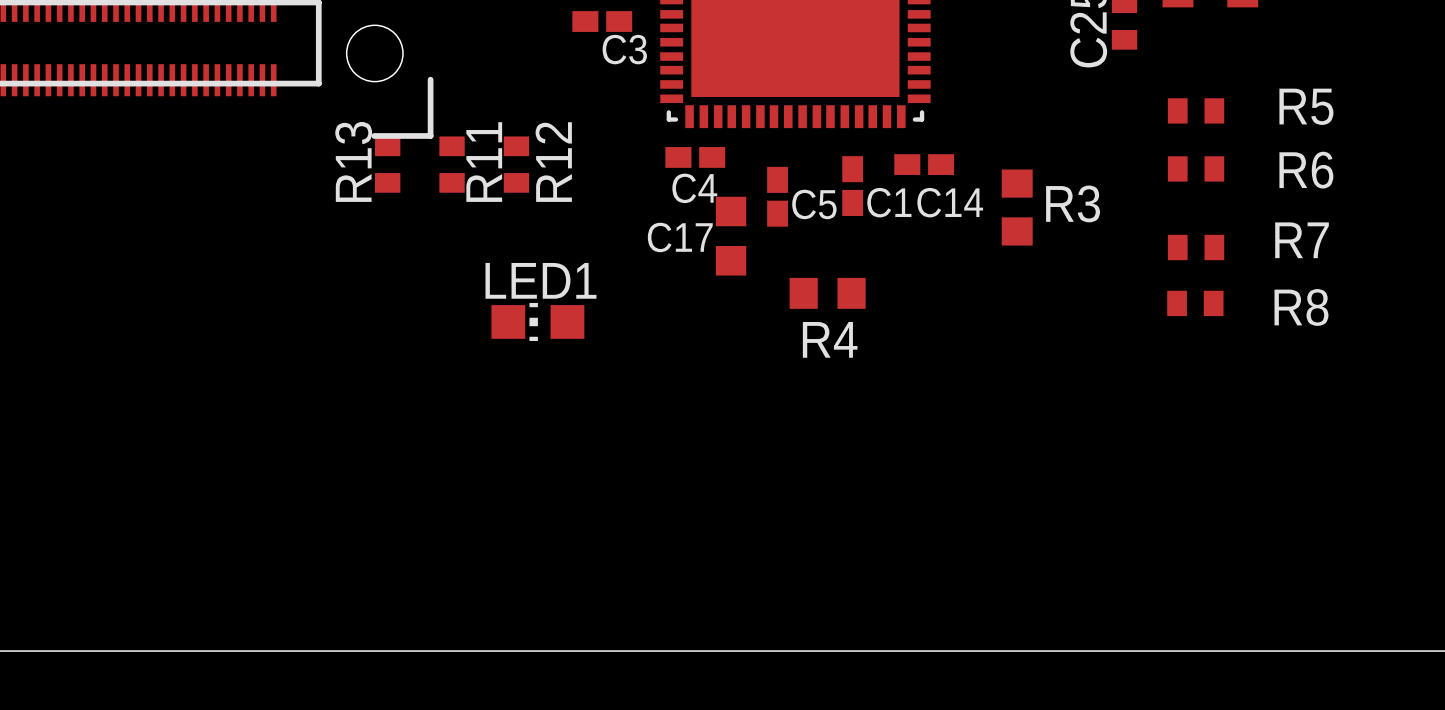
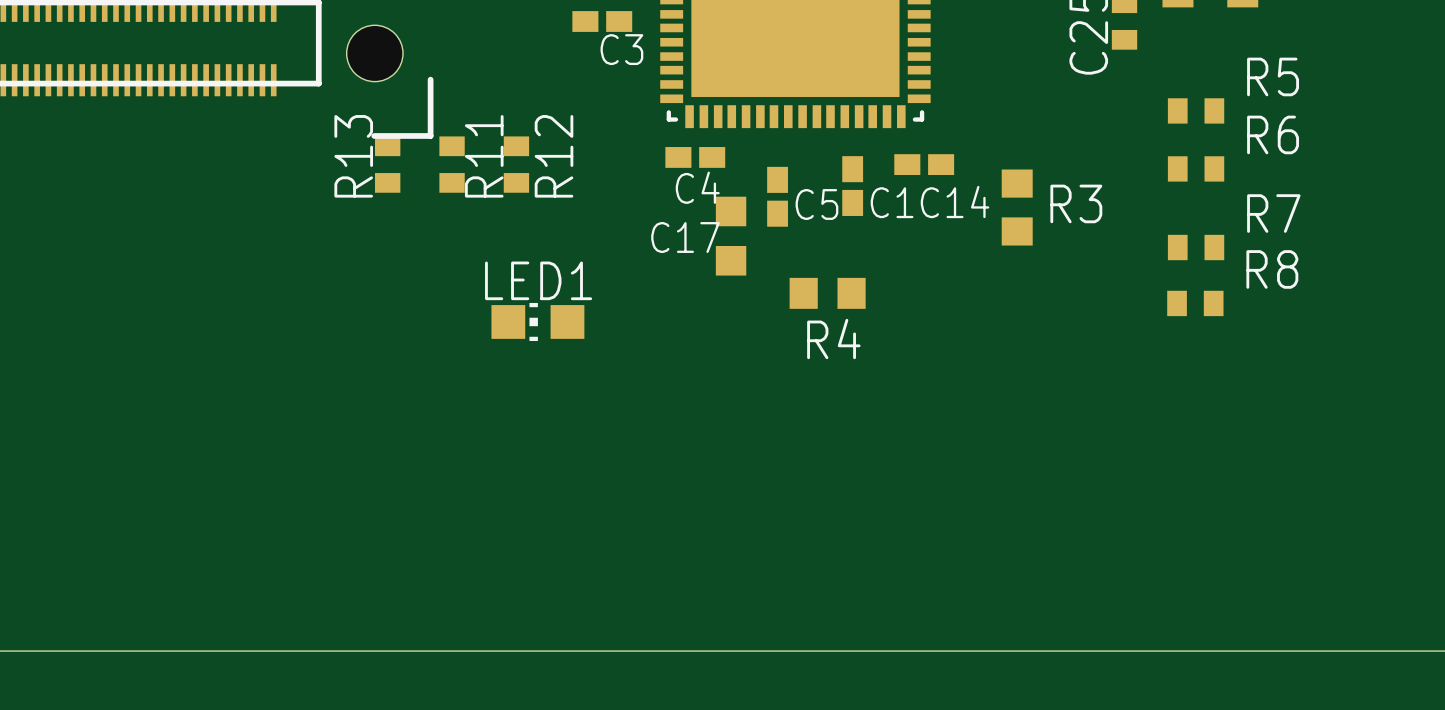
R5 name position: R5 (1306, 106) -> R5 (1273, 76)
R6 name position: R6 (1306, 170) -> R6 (1273, 134)
R7 name position: R7 (1302, 240) -> R7 (1273, 213)
R8 name position: R8 (1301, 307) -> R8 (1272, 269)

